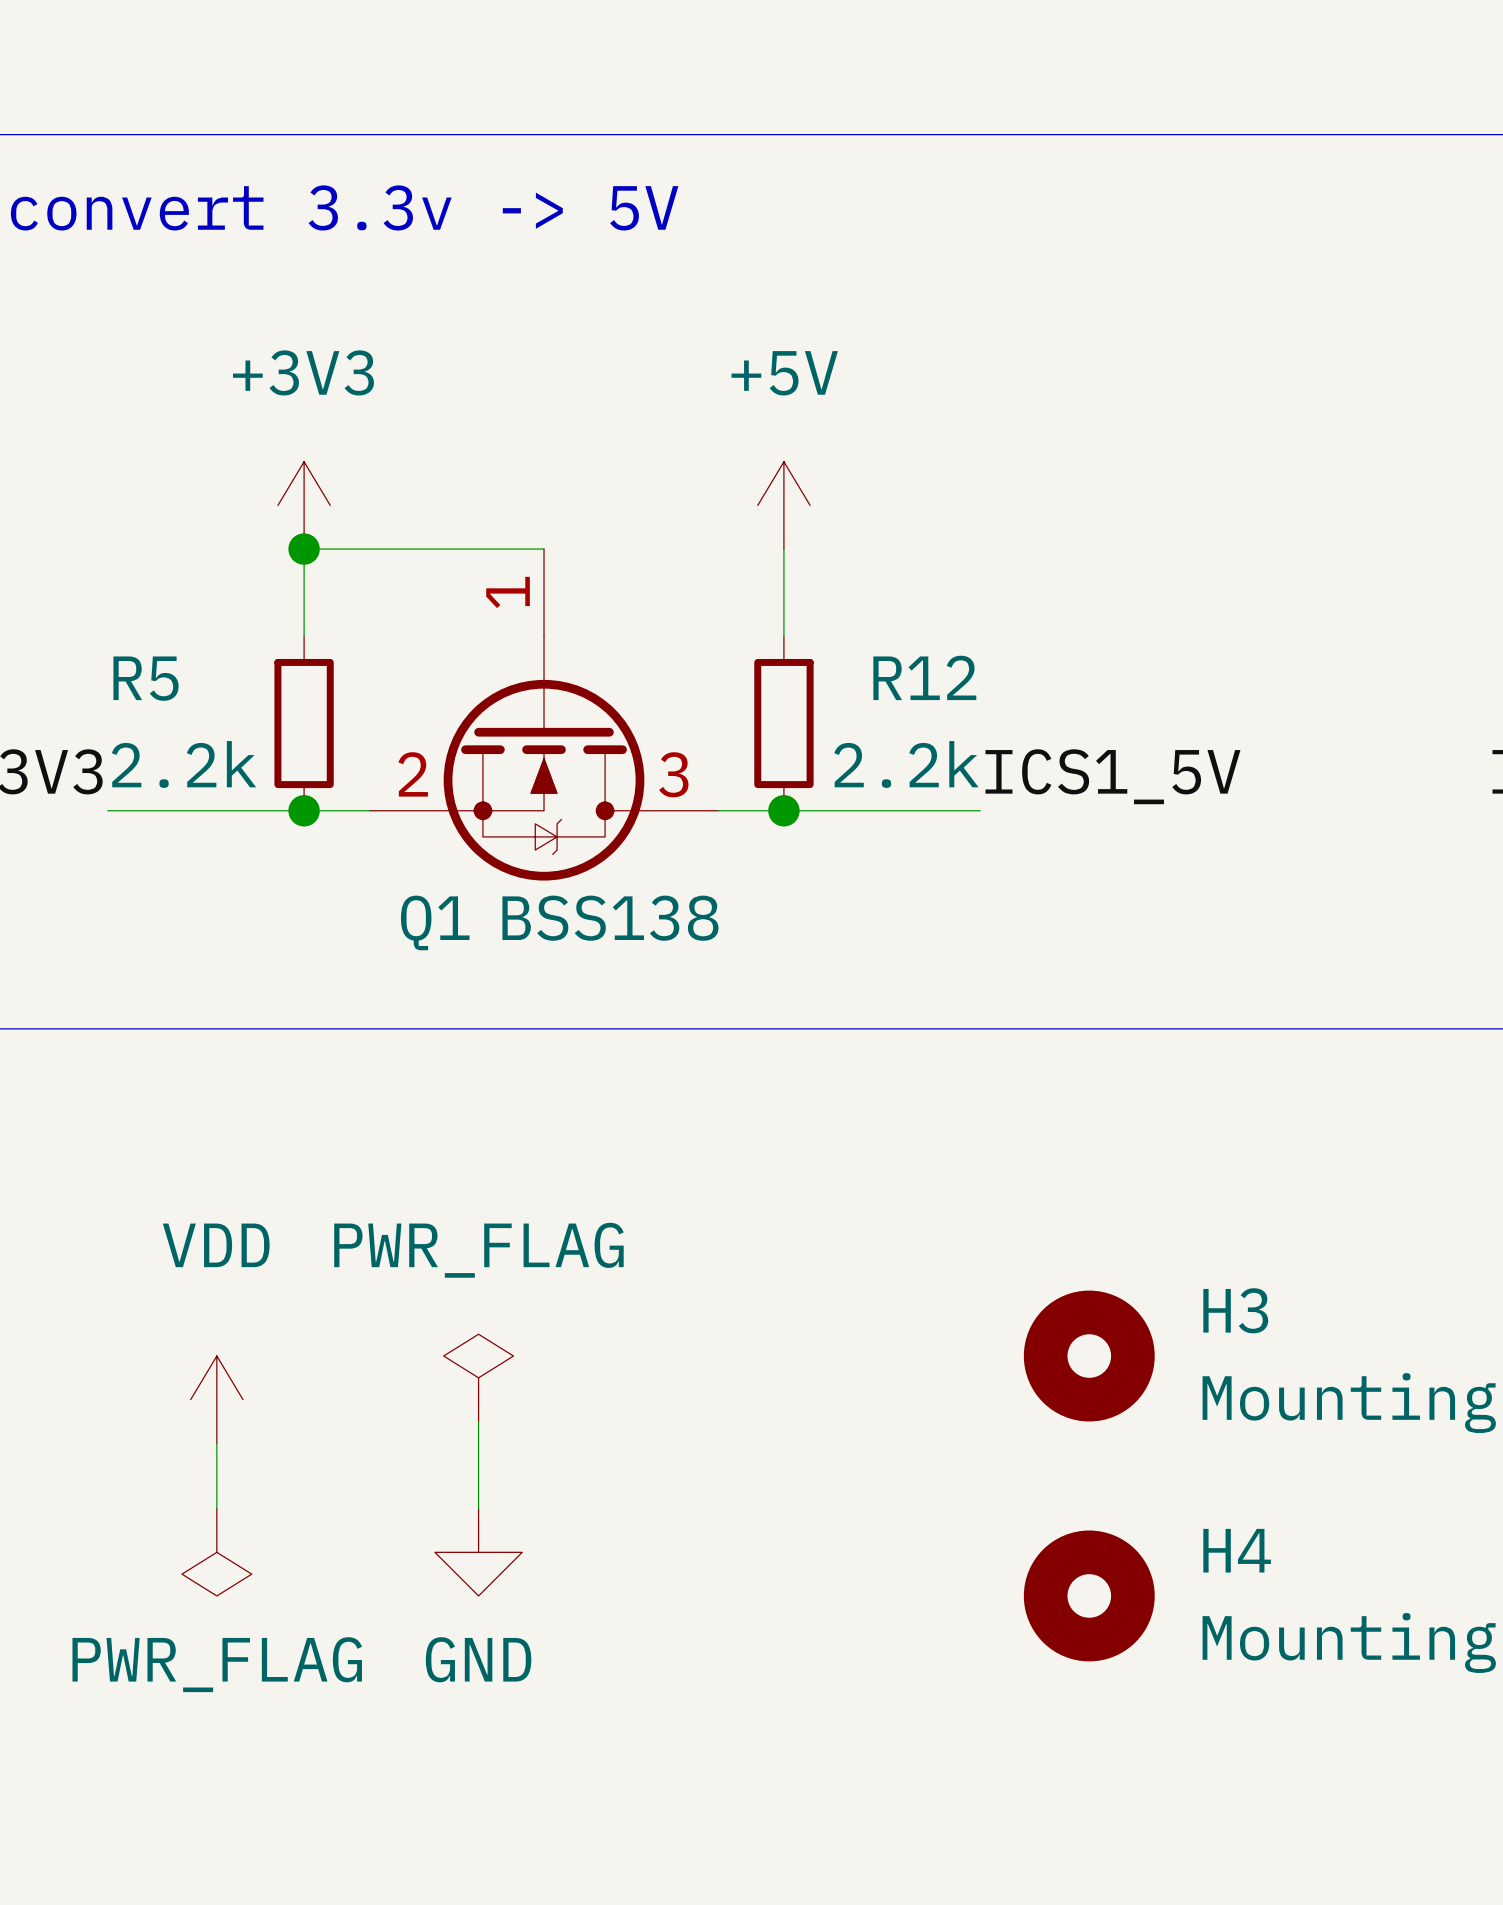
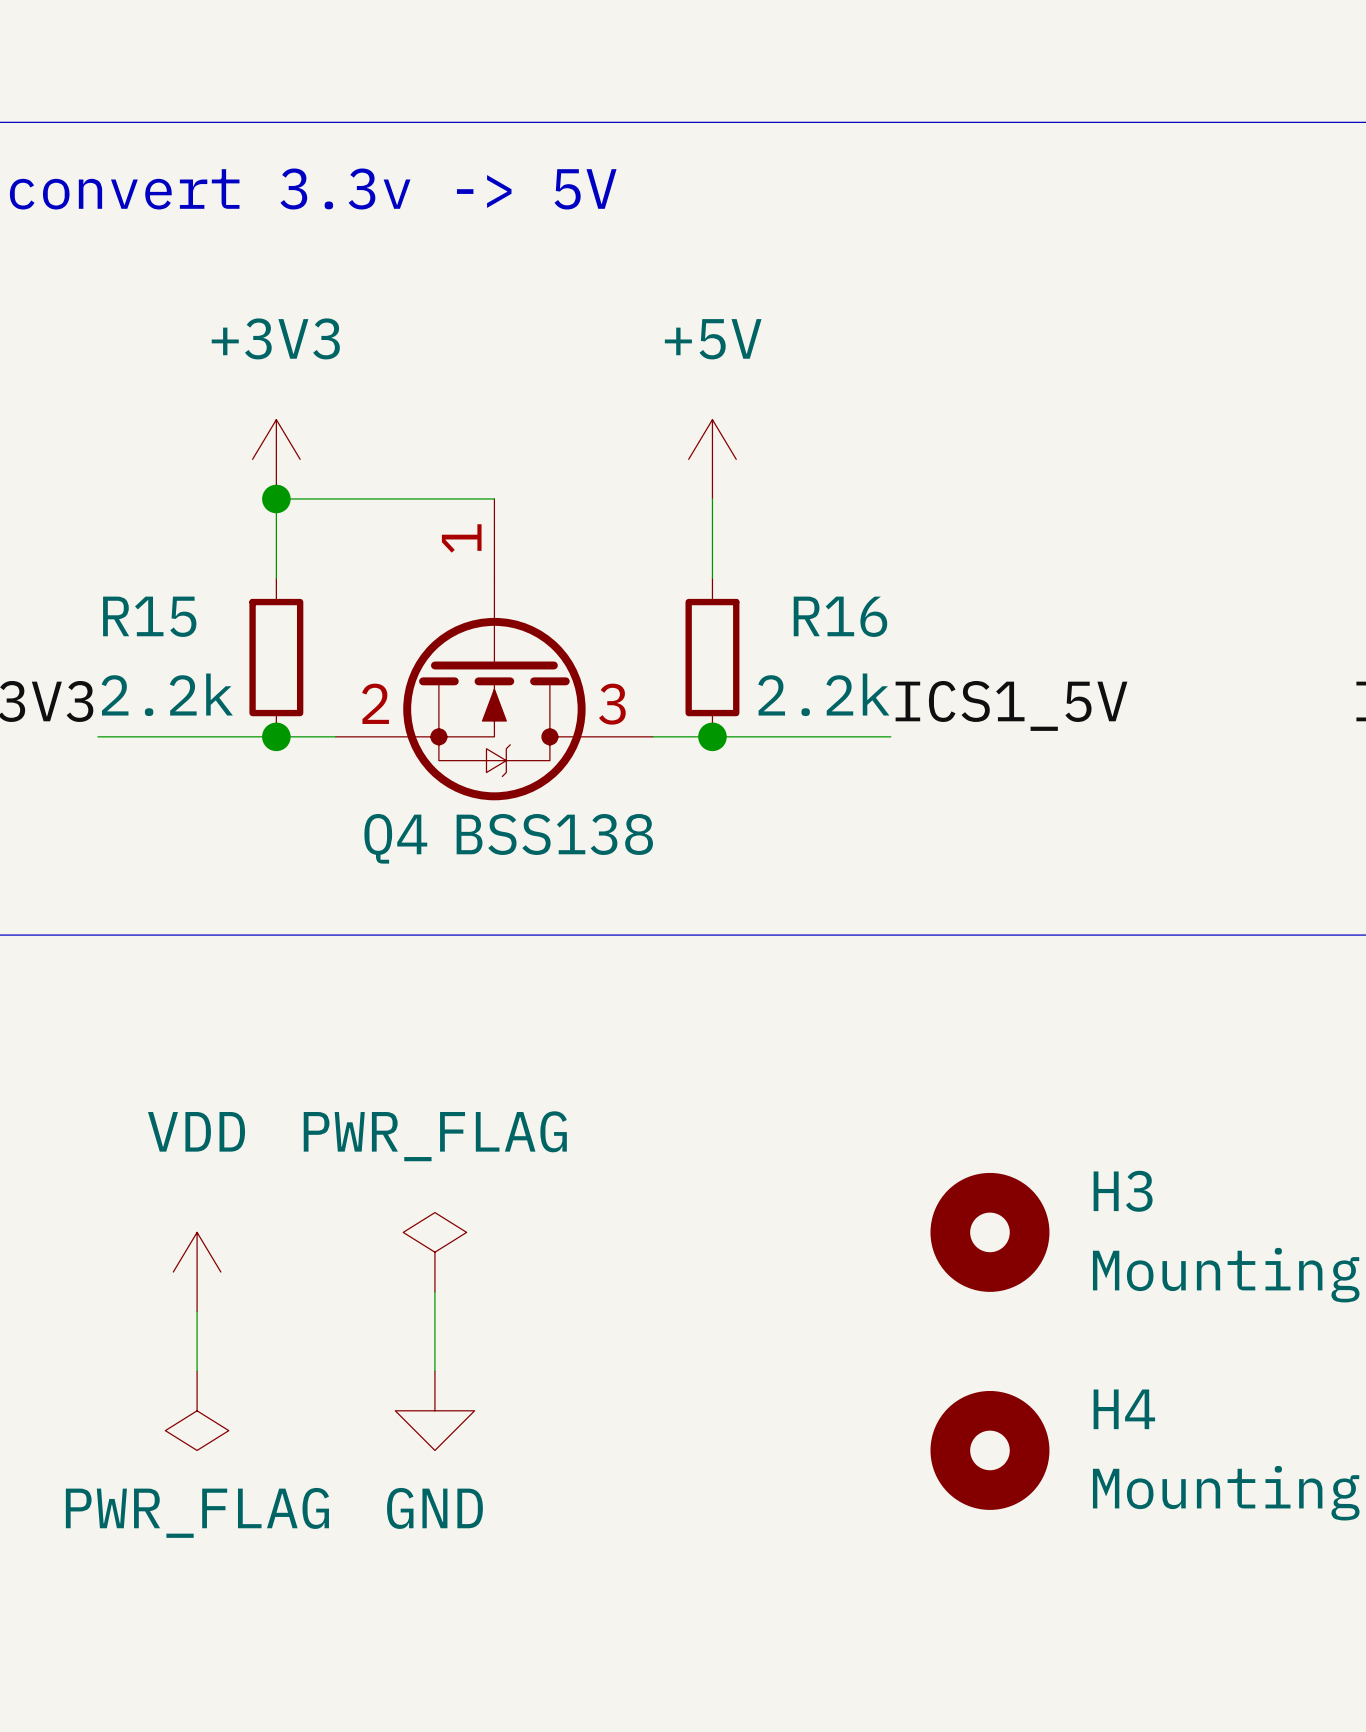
R12 name: R12 (924, 677) -> R16 (840, 616)
R5 name: R5 (146, 678) -> R15 (149, 616)
Q1 name: Q1 (435, 922) -> Q4 (395, 838)

